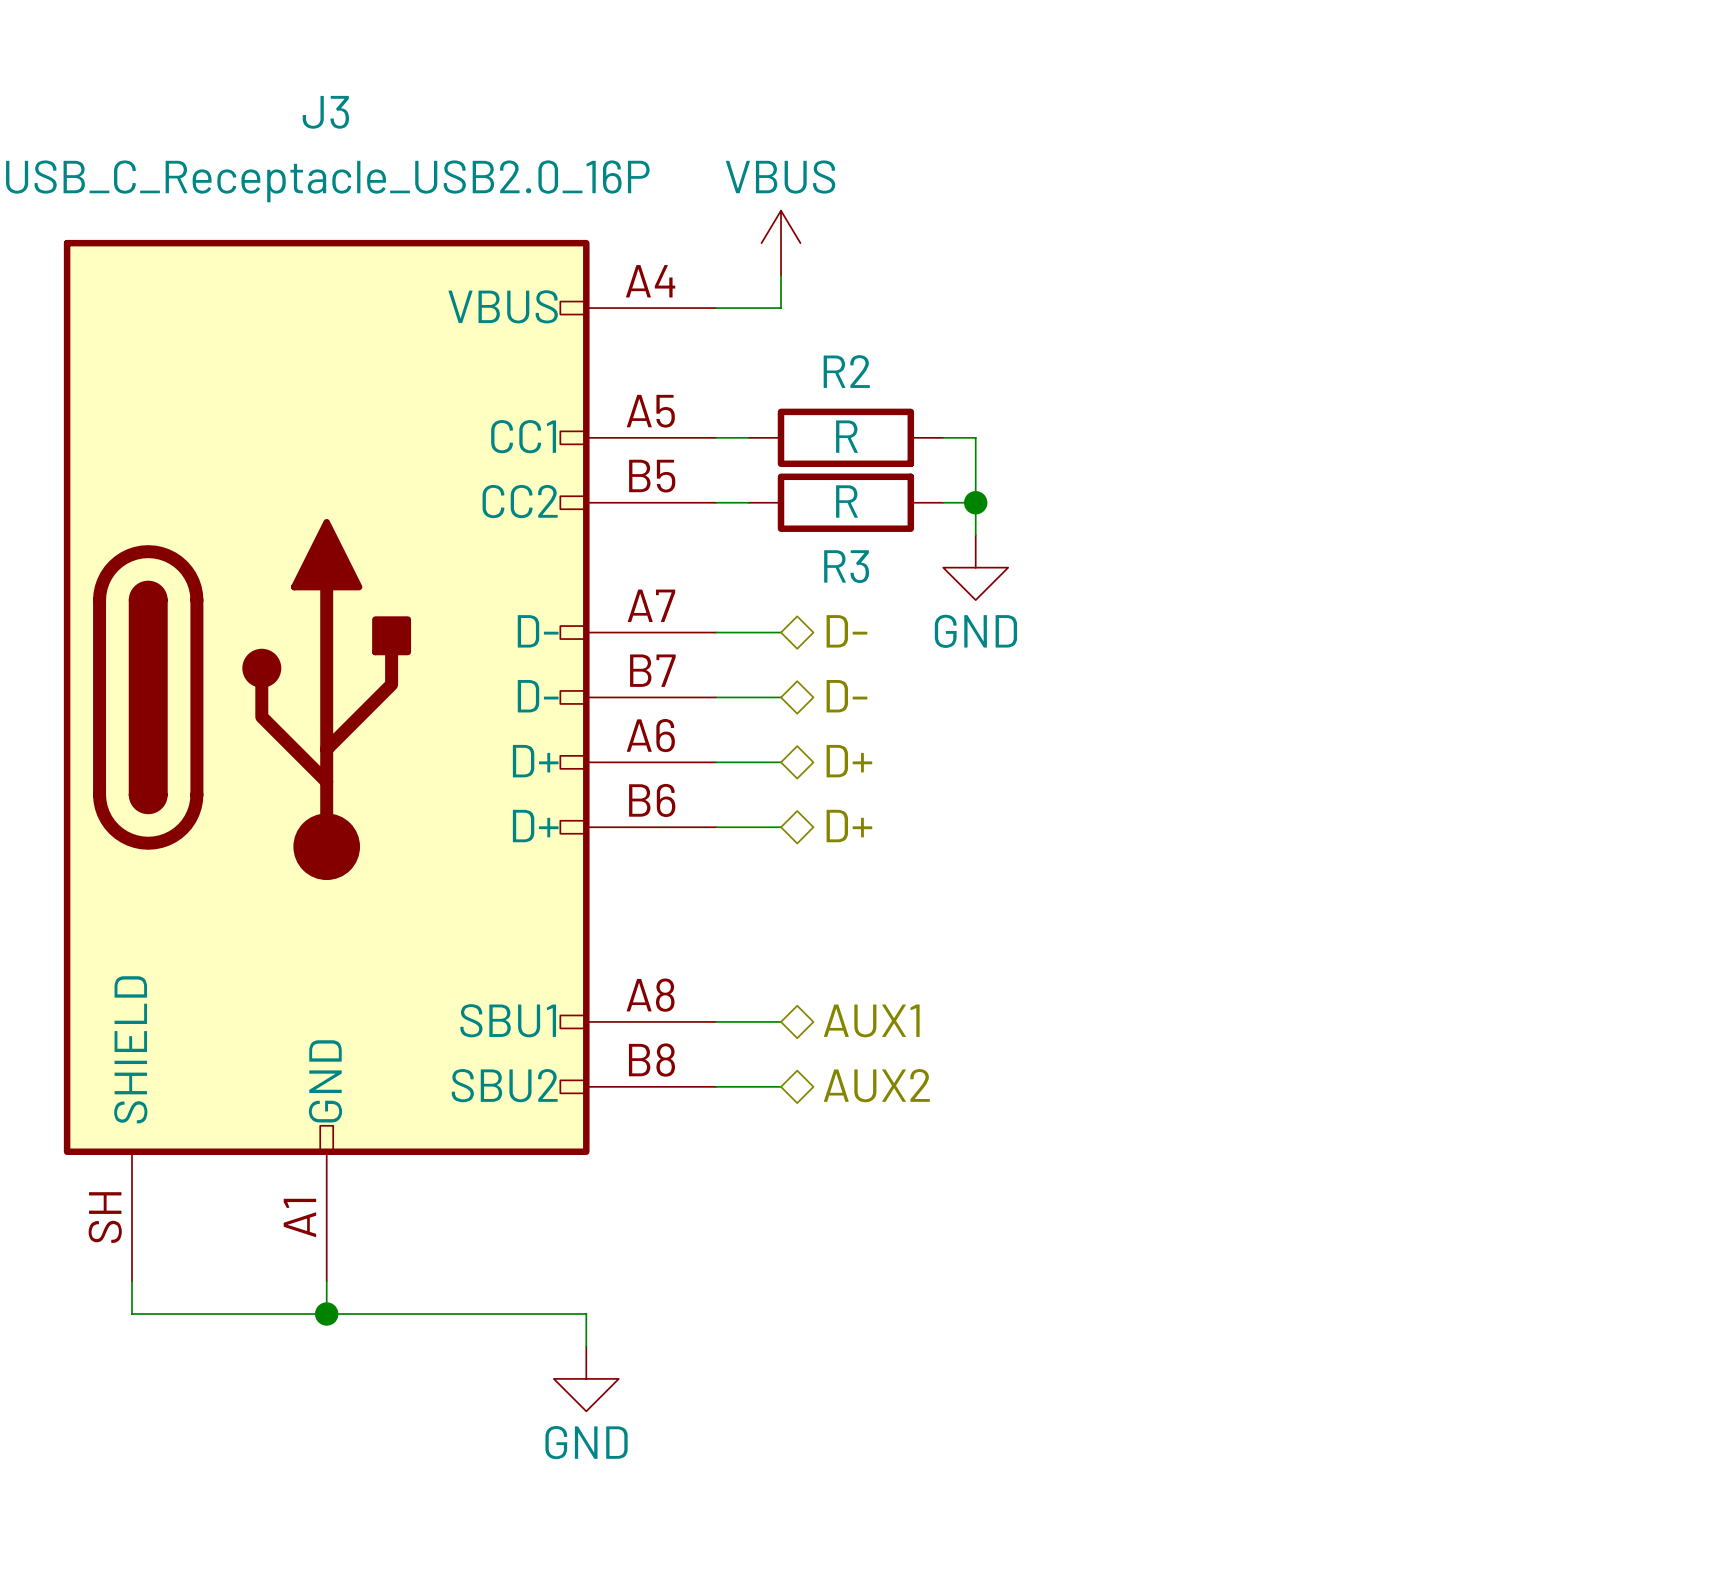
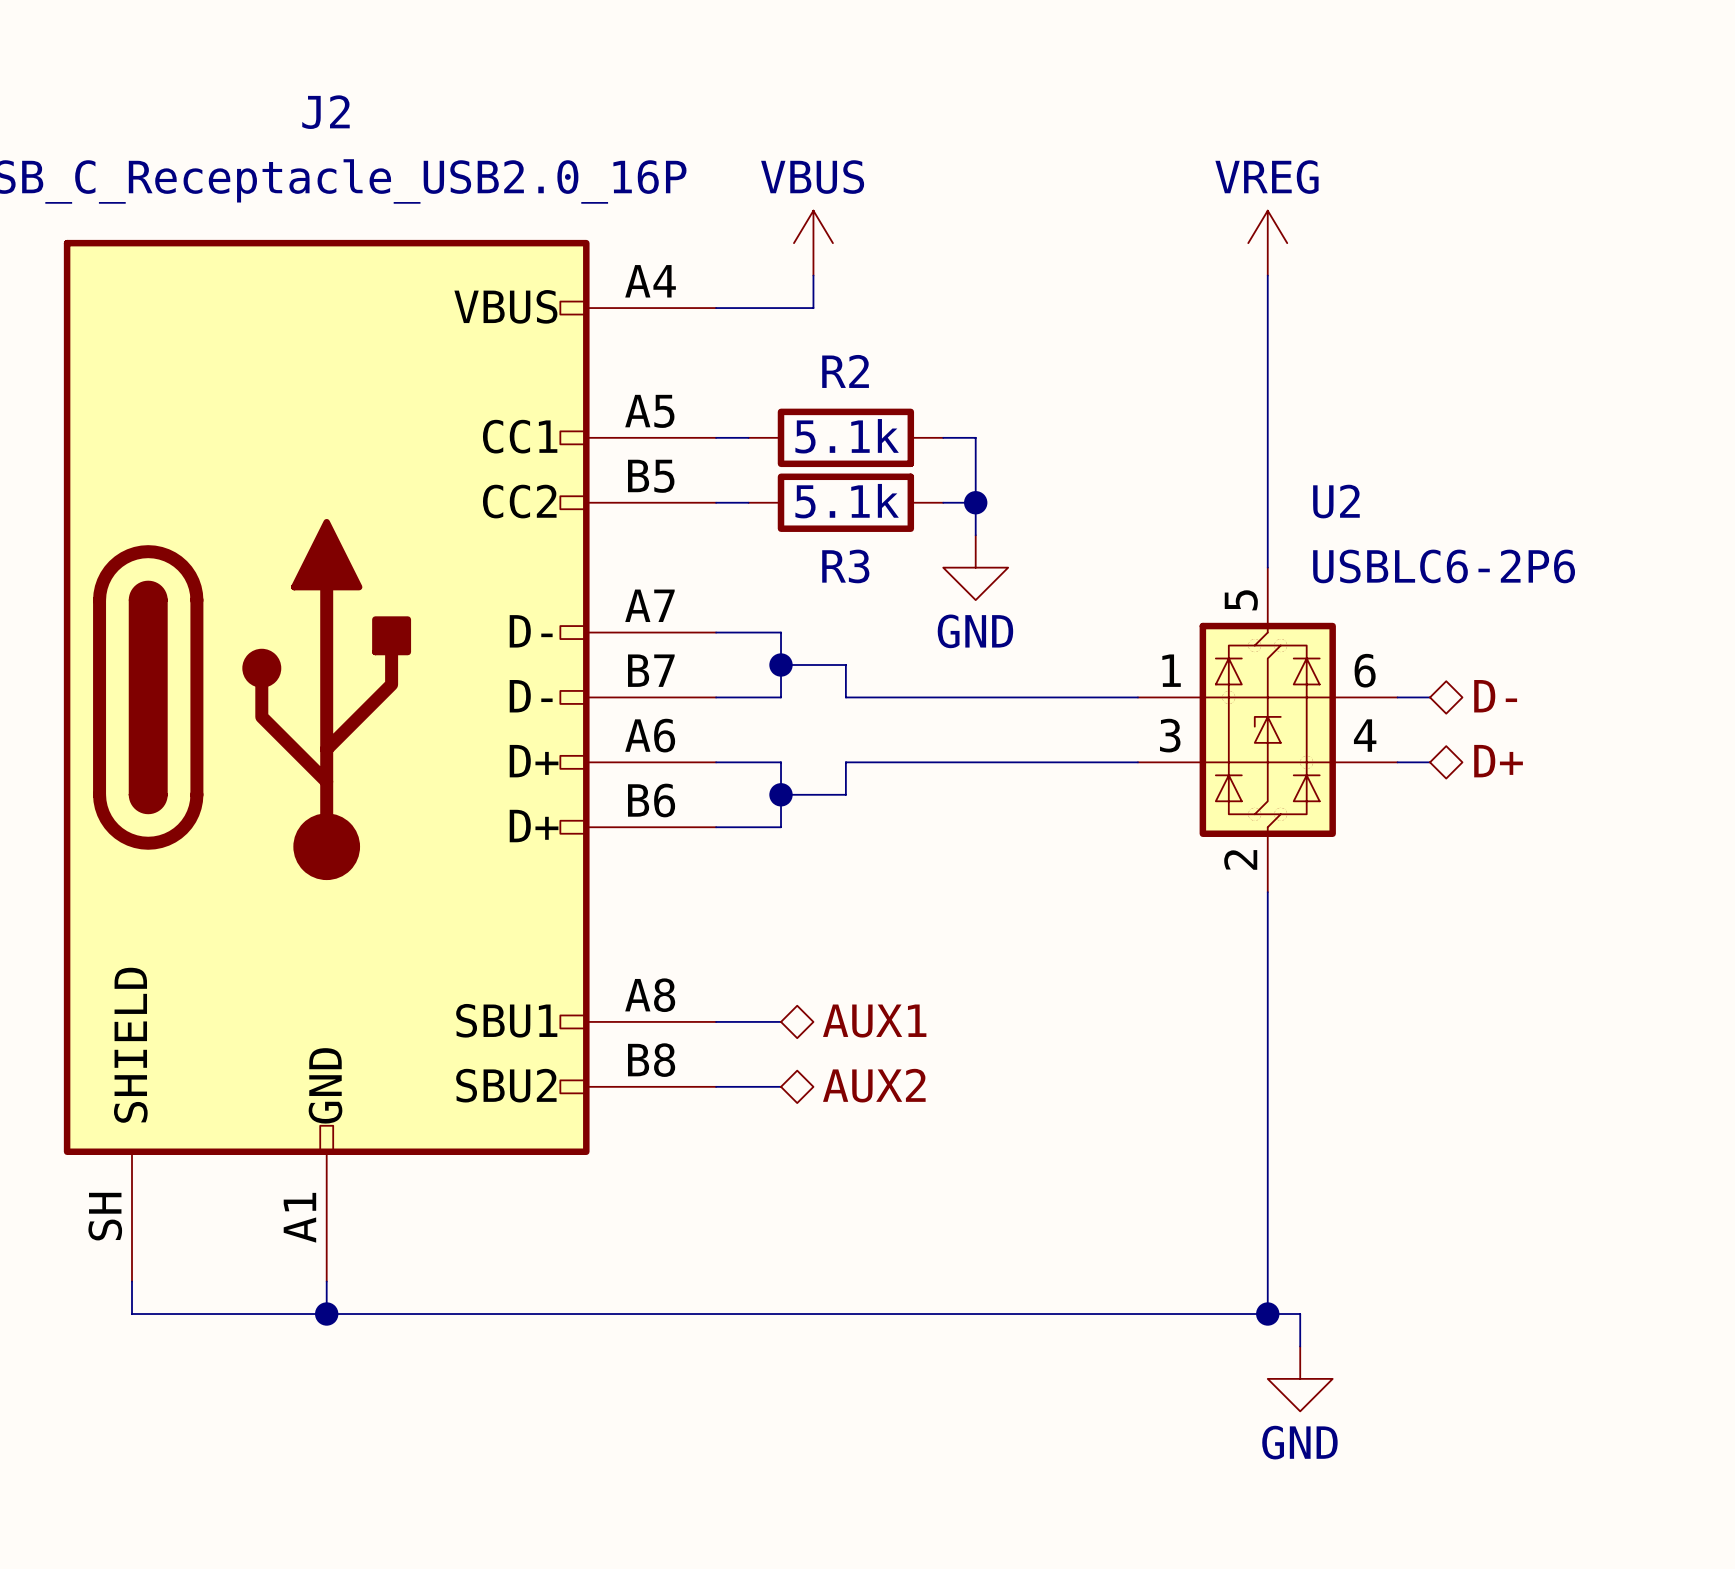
J3 name: J3 (325, 112) -> J2 (325, 112)
power symbol position: VBUS (781, 243) -> VBUS (813, 243)
power symbol: none -> VREG (1267, 243)
wire: (781, 275) (781, 308) -> (813, 275) (813, 308) (781, 308)
wire: none -> (1267, 275) (1267, 567)
R2 value: R (846, 436) -> 5.1k (847, 436)
R3 value: R (846, 501) -> 5.1k (847, 501)
hierarchical label: D- (846, 631) -> none
wire: none -> (781, 632) (781, 697)
wire: none -> (781, 665) (845, 665) (845, 697) (1137, 697)
junction: none -> (781, 665)
hierarchical label: D- (846, 696) -> none
hierarchical label: none -> D- (1495, 696)
wire: none -> (1397, 697) (1430, 697)
U2: none -> USBLC6-2P6 (1267, 729)
hierarchical label: D+ (849, 761) -> none
hierarchical label: none -> D+ (1498, 761)
wire: none -> (781, 762) (781, 827)
wire: none -> (1137, 762) (845, 762) (845, 794) (781, 794)
wire: none -> (1397, 762) (1430, 762)
junction: none -> (781, 794)
hierarchical label: D+ (849, 826) -> none
wire: none -> (1267, 892) (1267, 1314)
wire: (586, 1314) (586, 1346) -> (586, 1314) (1300, 1314) (1300, 1346)
junction: none -> (1267, 1314)
power symbol: GND (586, 1378) -> none
power symbol: none -> GND (1300, 1378)

